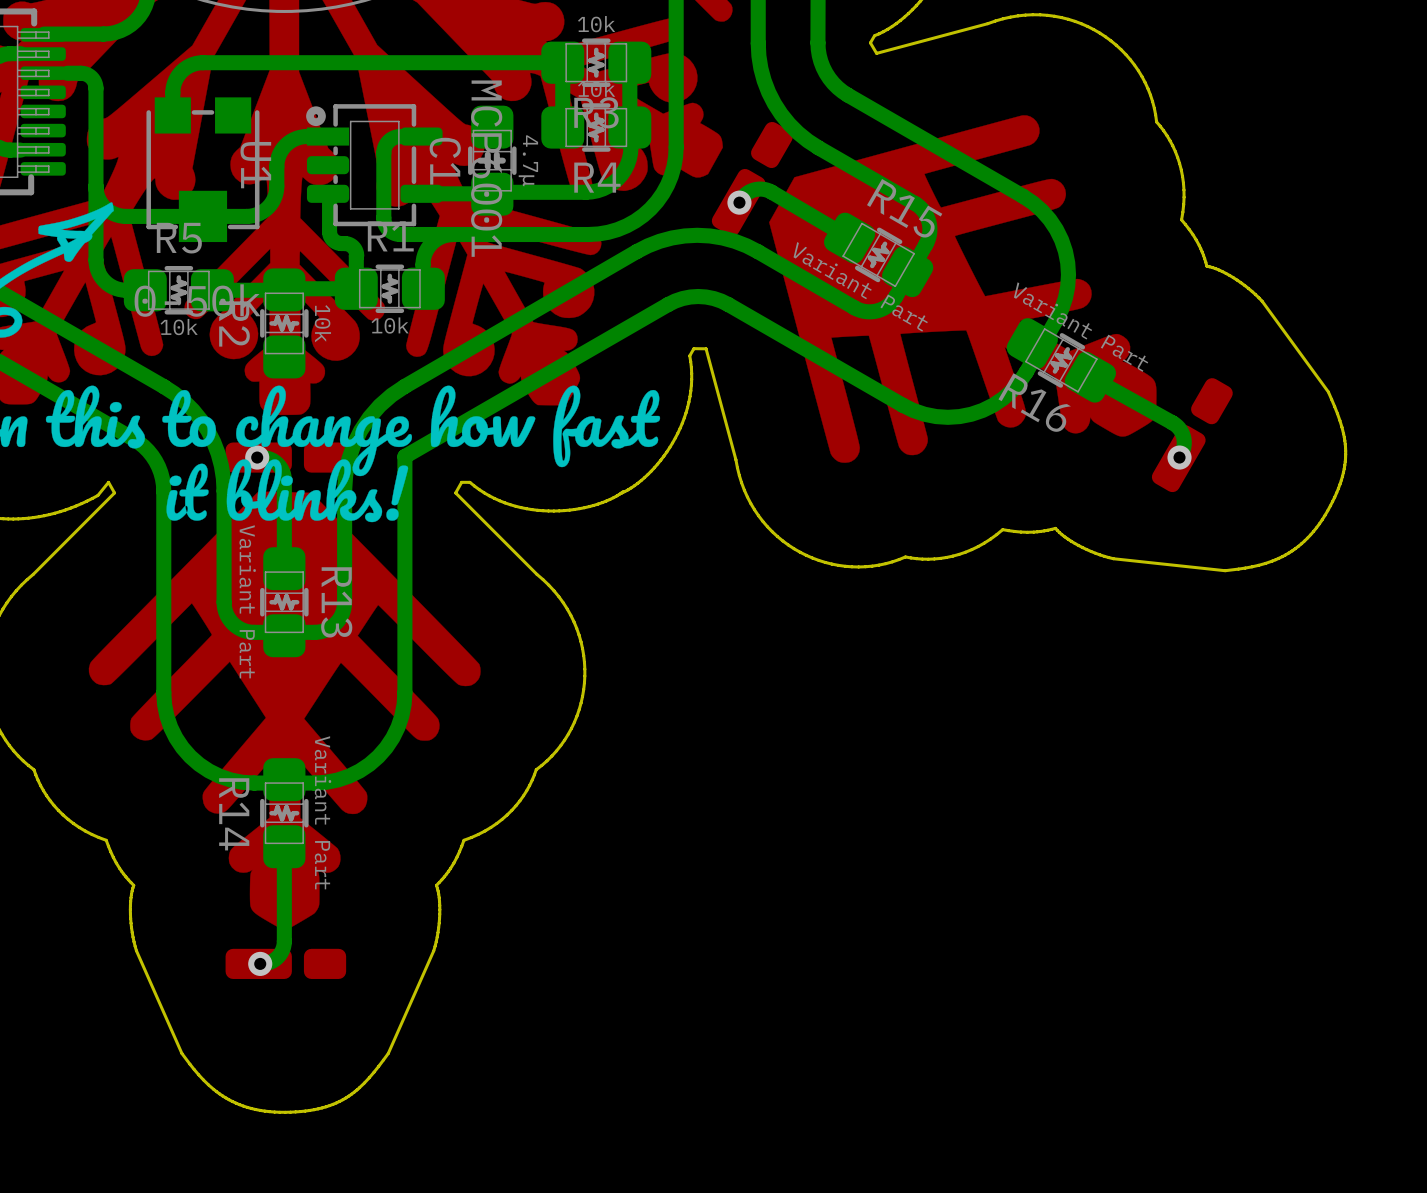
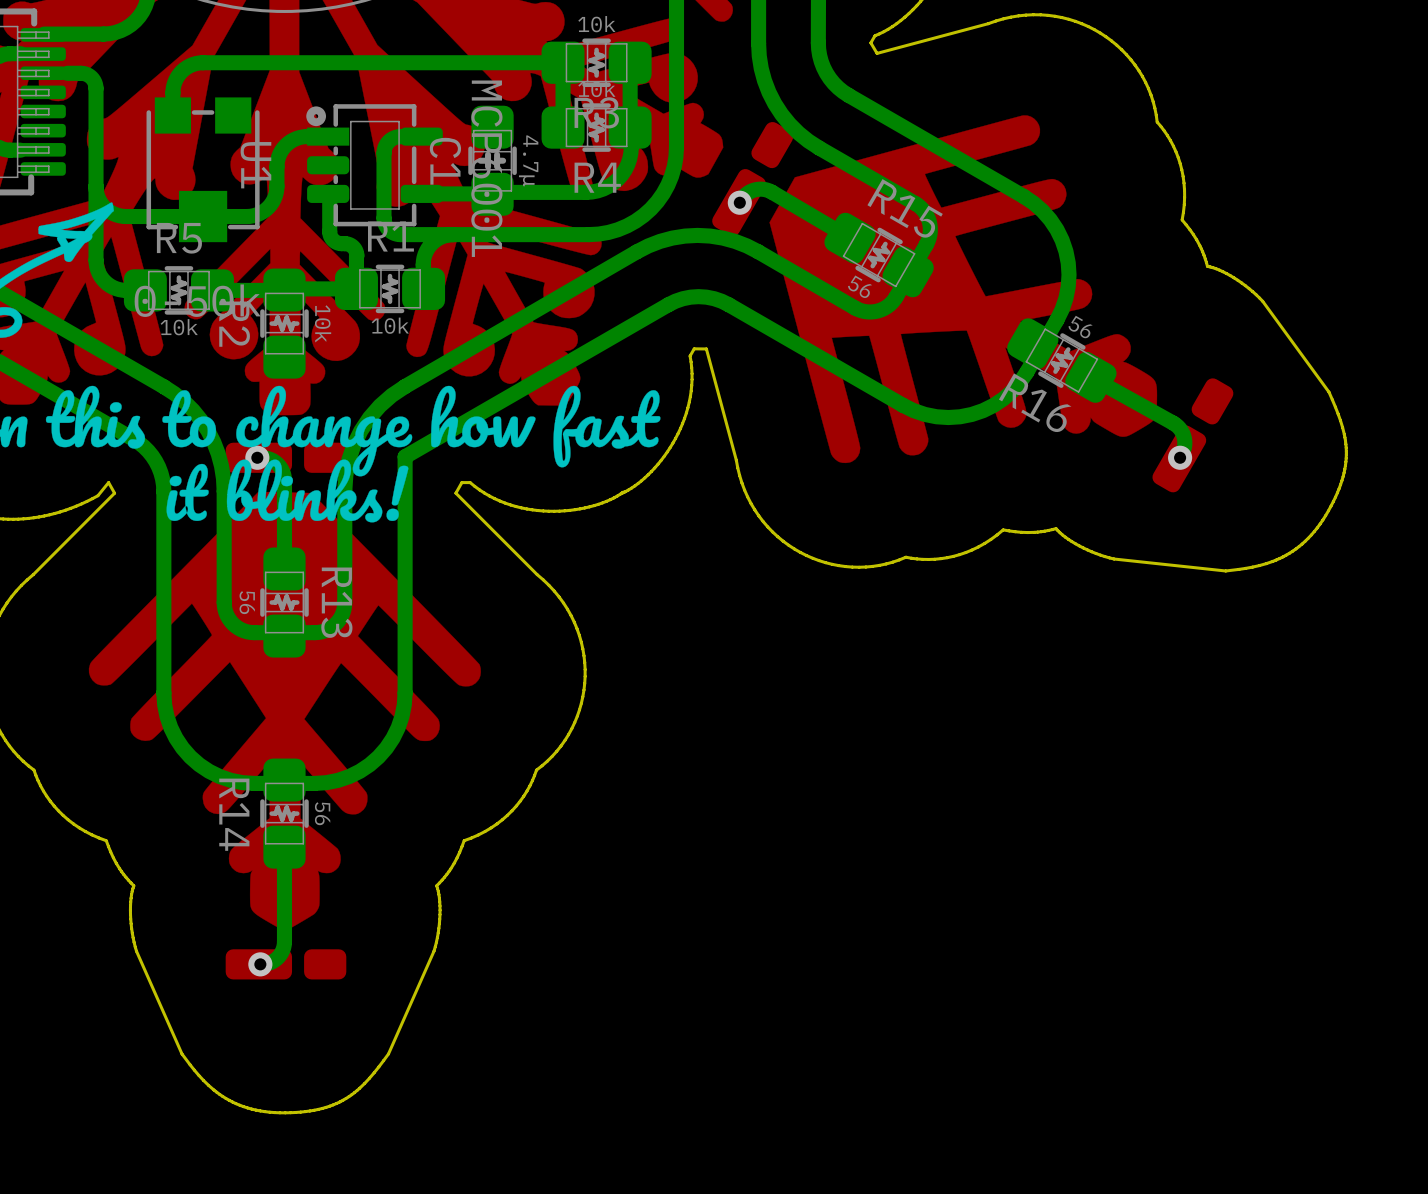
R15 value: Variant Part (860, 286) -> 56 (860, 286)
R16 value: Variant Part (1081, 327) -> 56 (1080, 327)
R13 value: Variant Part (247, 601) -> 56 (247, 602)
R14 value: Variant Part (322, 812) -> 56 (322, 813)

